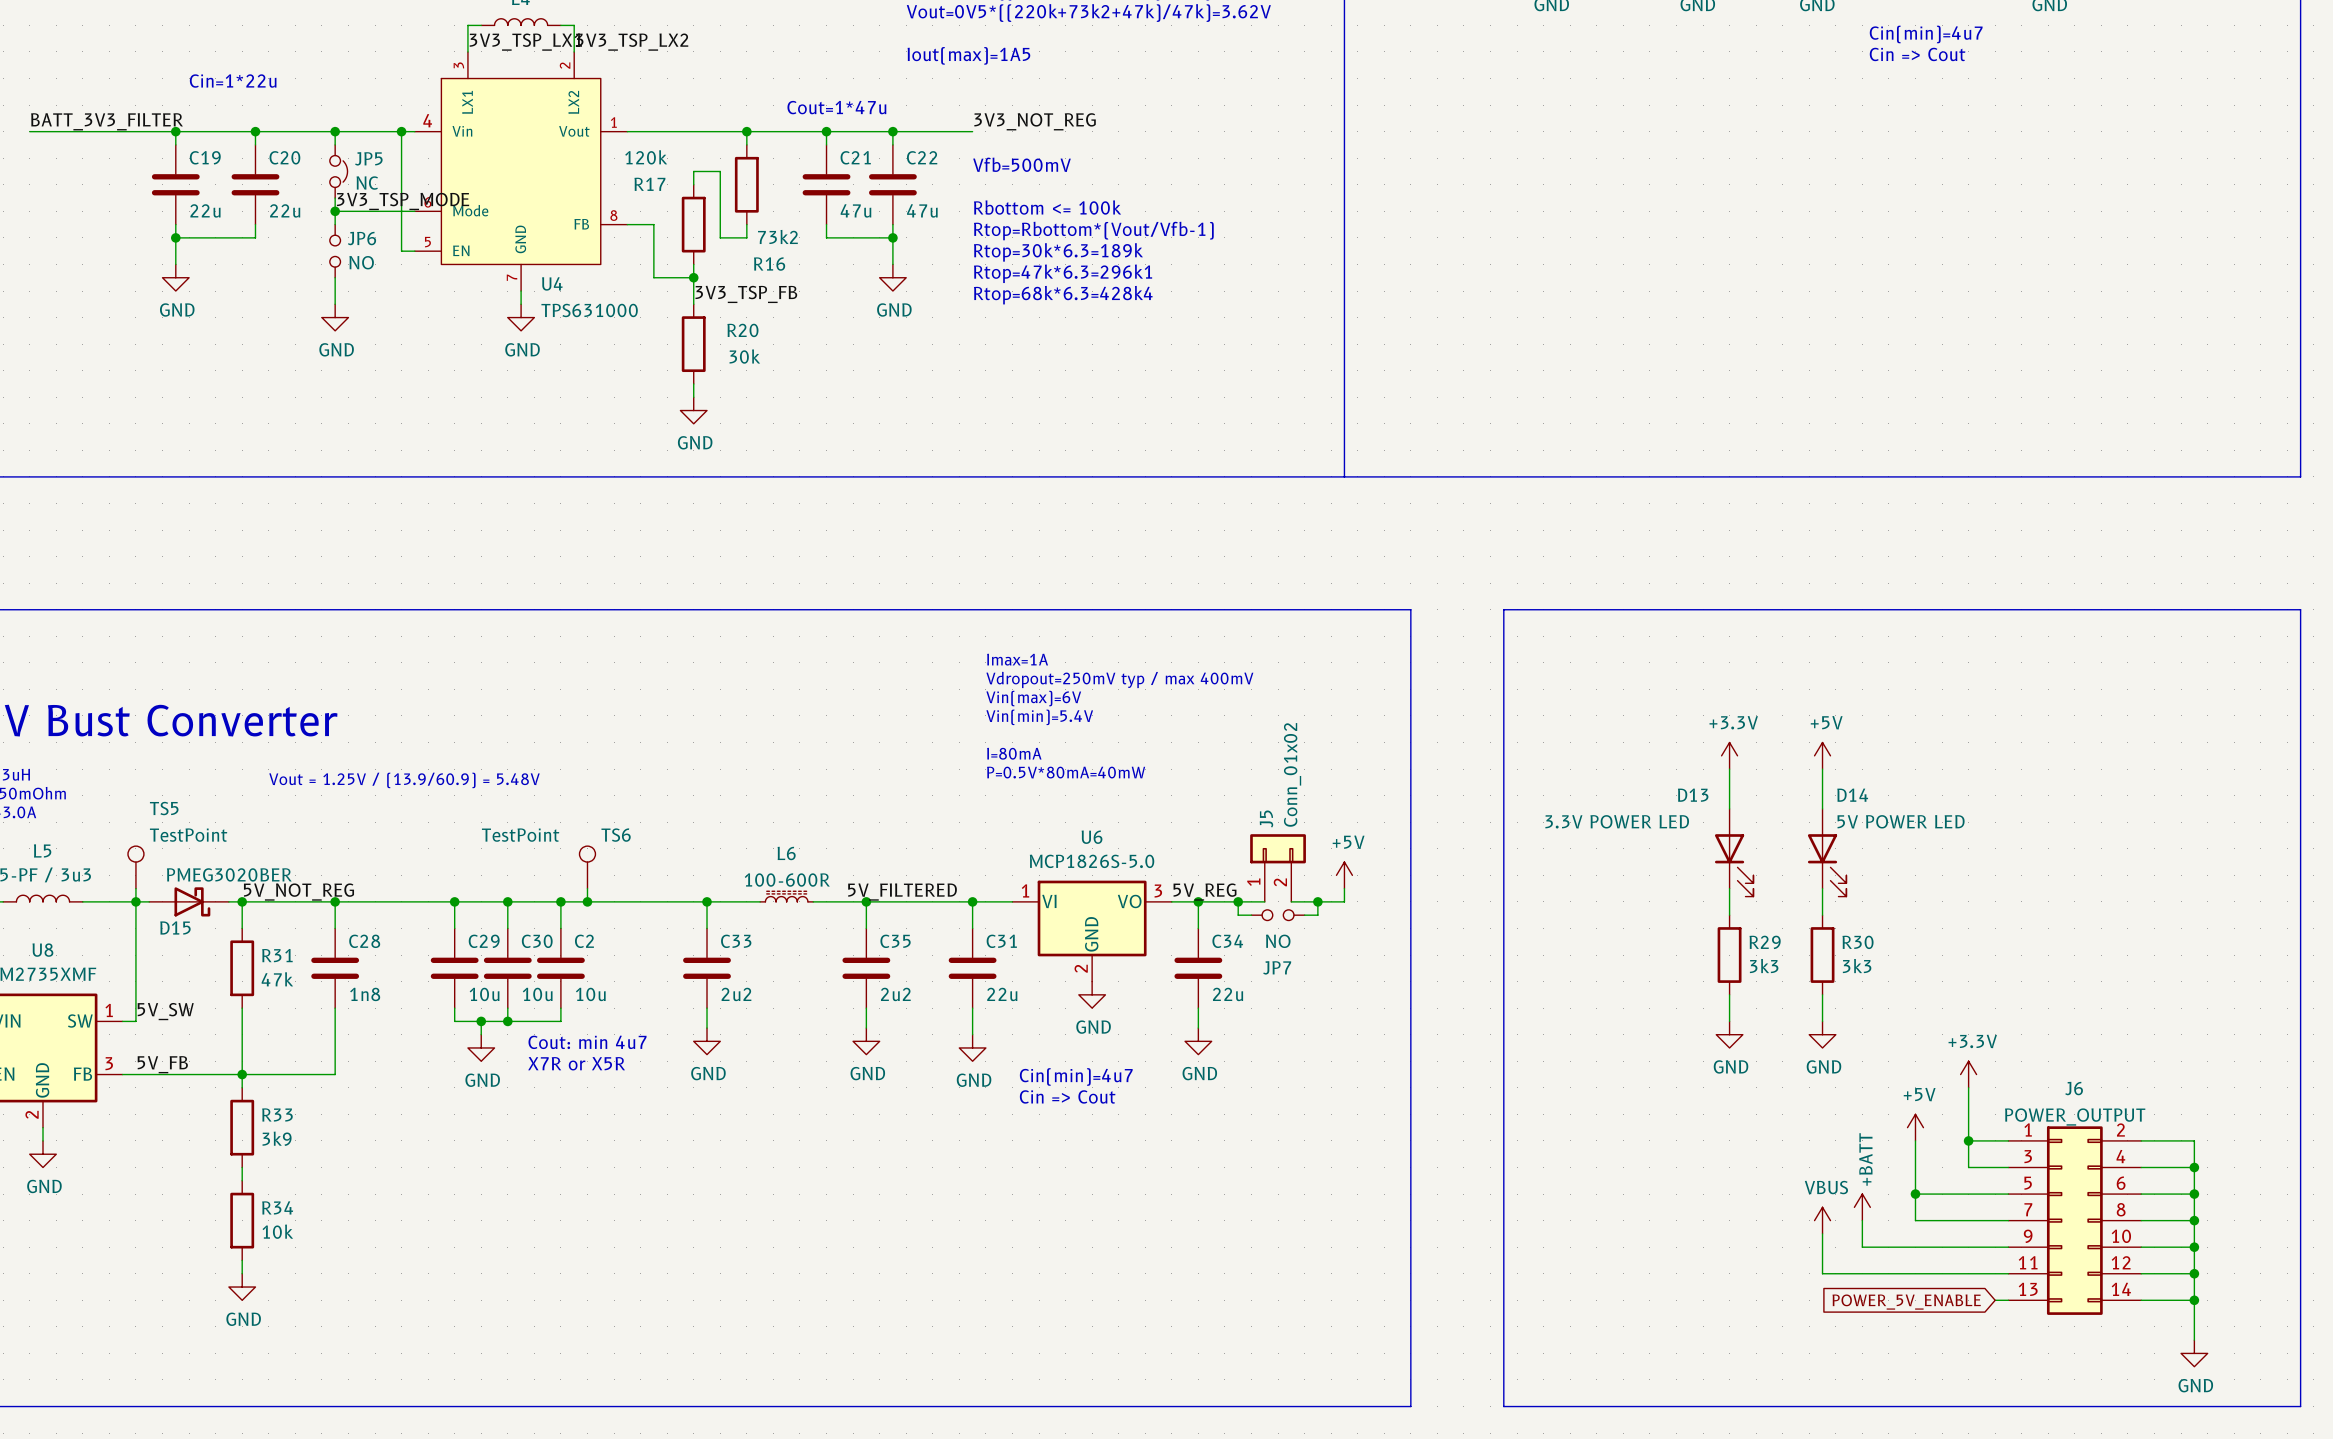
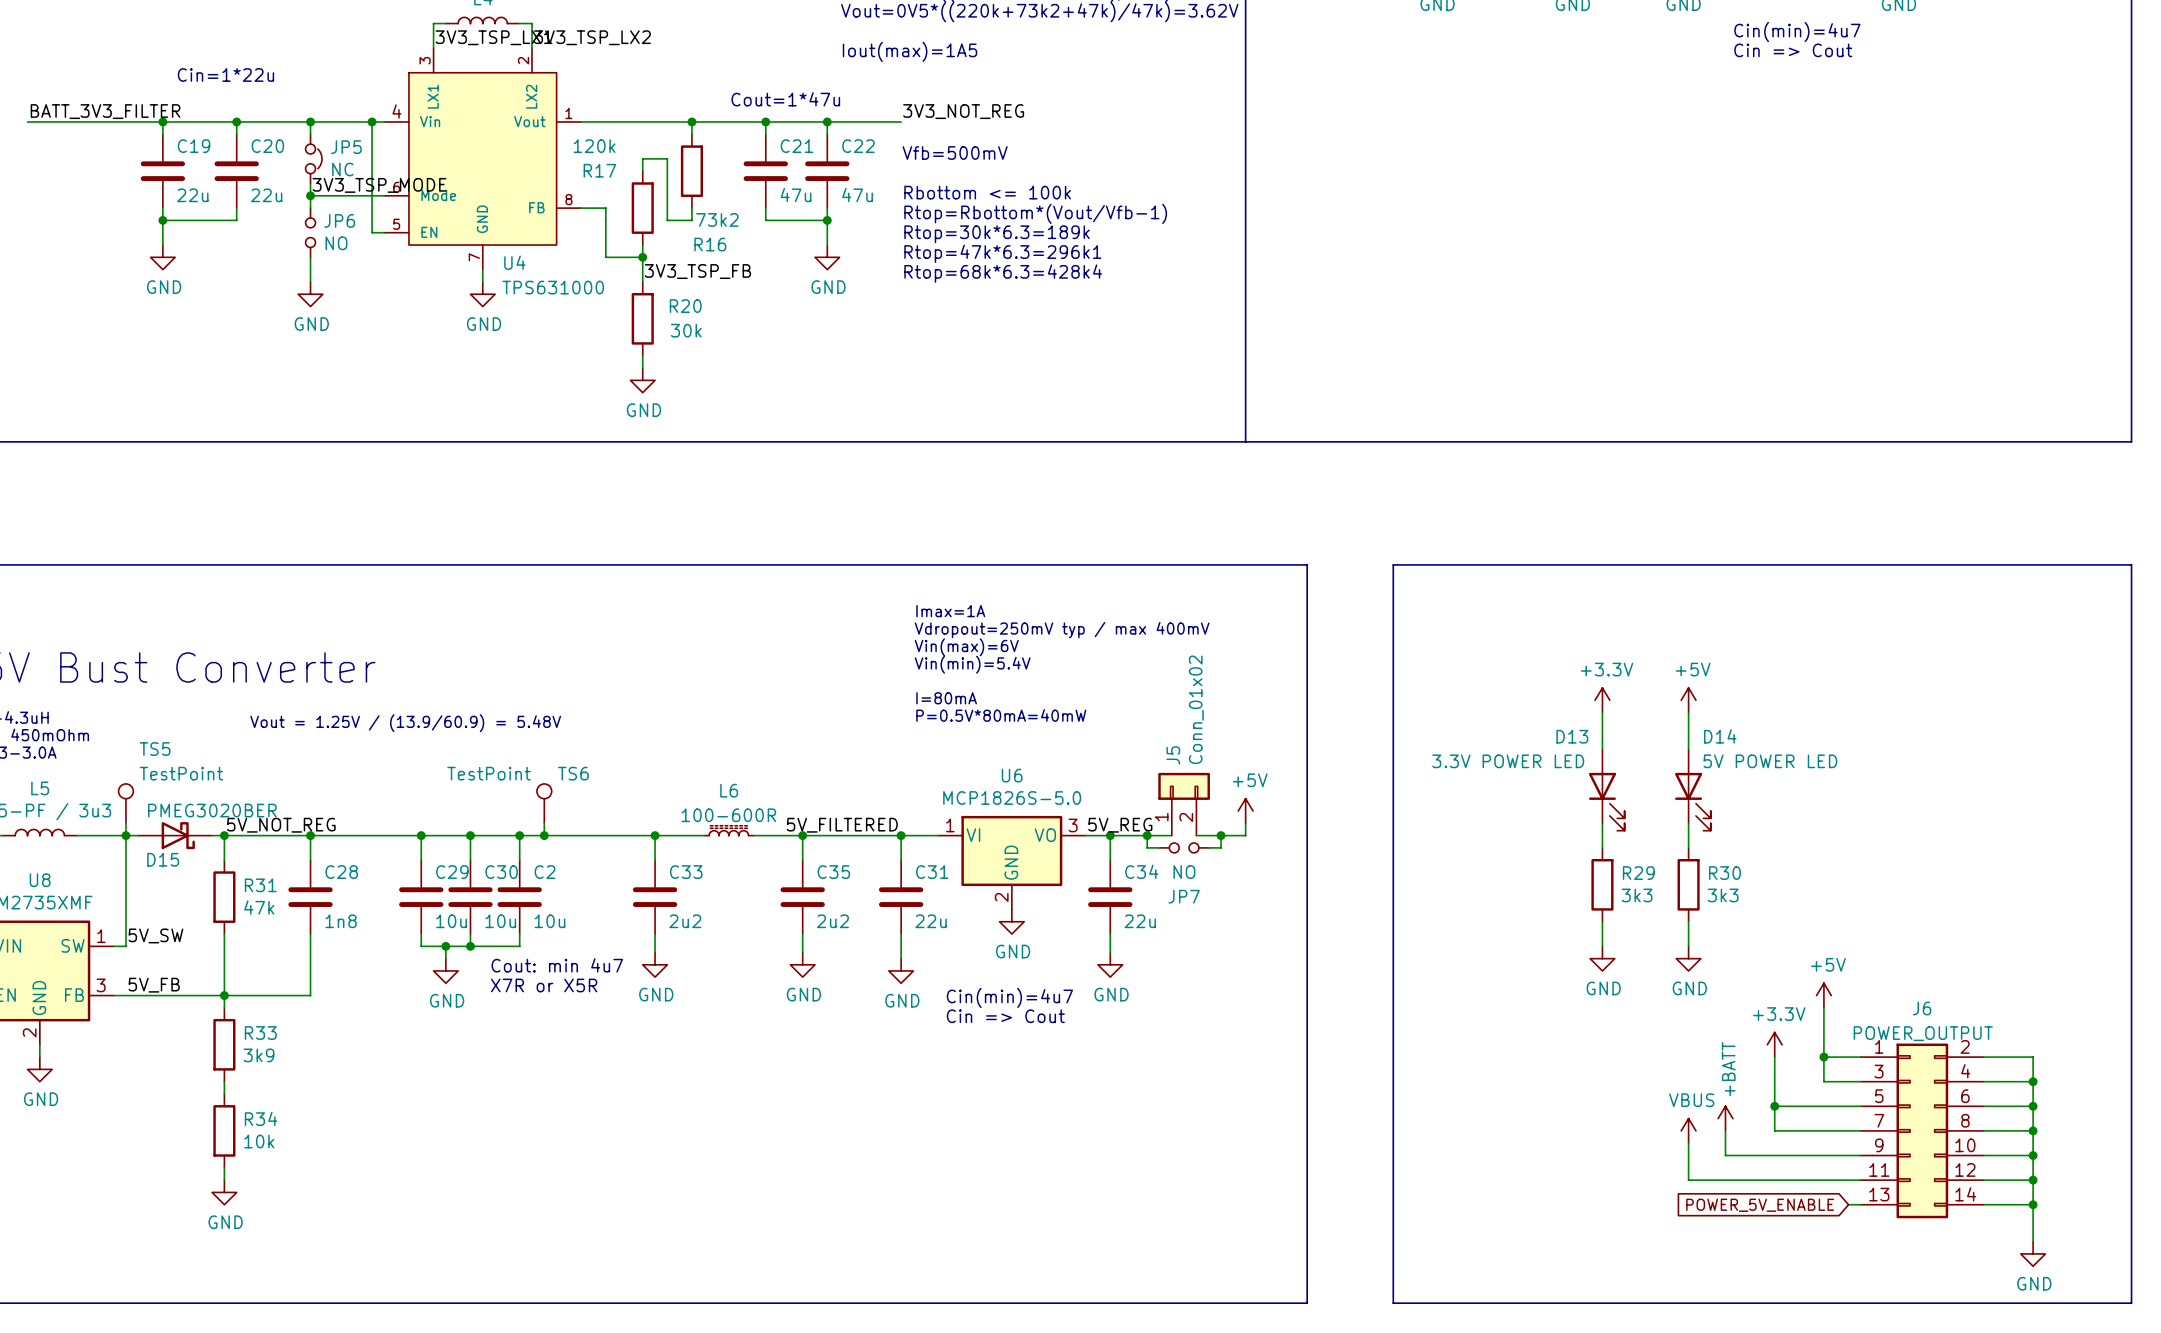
power symbol: +3.3V (1968, 1074) -> +5V (1823, 995)
power symbol: +5V (1915, 1127) -> +3.3V (1774, 1044)

